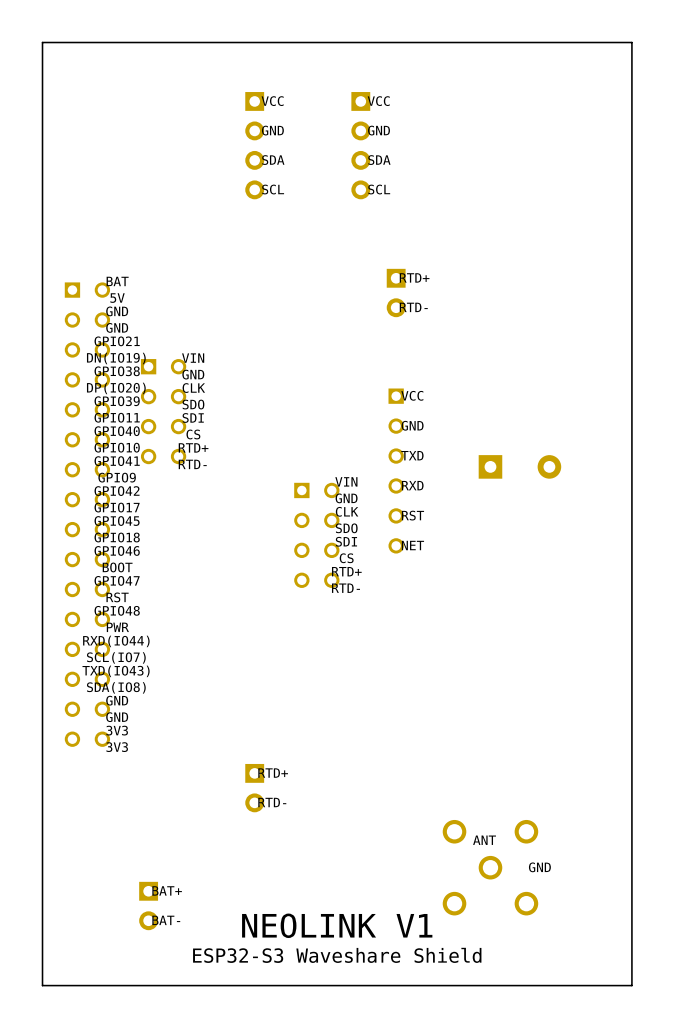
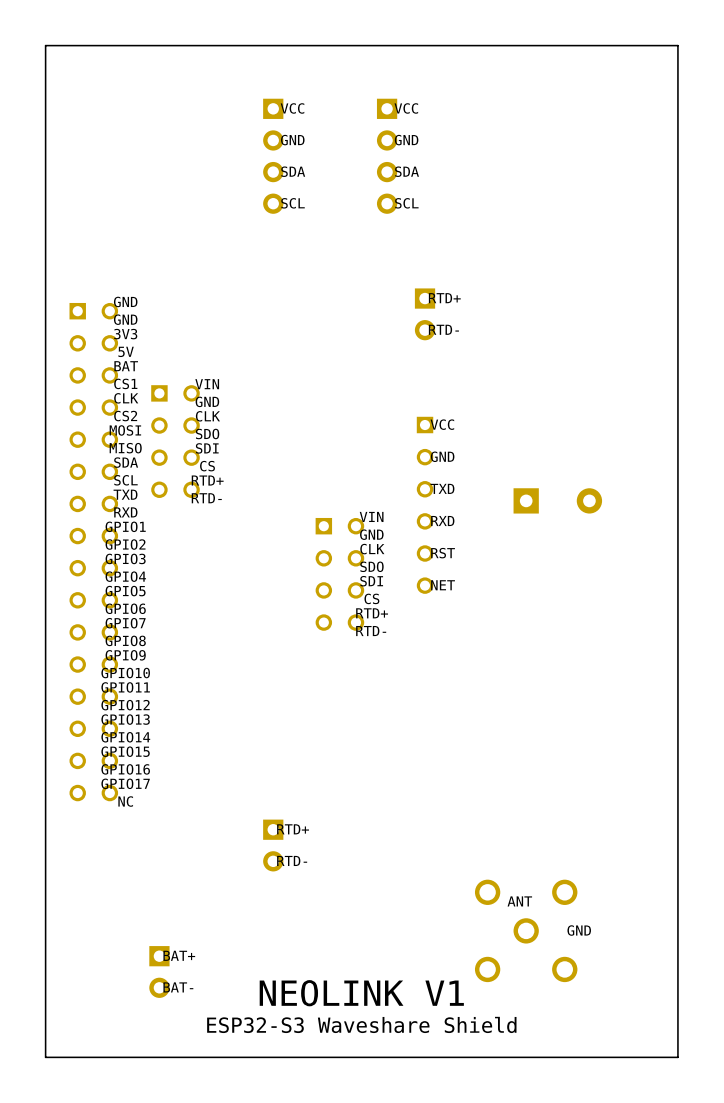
text: BAT (117, 281) -> GND (125, 301)
text: 5V (117, 298) -> GND (125, 319)
text: GND (117, 311) -> 3V3 (125, 334)
text: GND (117, 327) -> 5V (126, 351)
text: GPIO21 (117, 341) -> BAT (126, 366)
text: DN(IO19) (116, 358) -> CS1 (125, 383)
text: GPIO38 (117, 371) -> CLK (126, 398)
text: DP(IO20) (116, 388) -> CS2 (125, 416)
text: GPIO39 (117, 401) -> MOSI (125, 430)
text: GPIO11 (117, 417) -> MISO (125, 448)
text: GPIO40 (117, 431) -> SDA (126, 462)
text: GPIO10 (117, 447) -> SCL (125, 480)
text: GPIO41 (117, 461) -> TXD (125, 494)
text: GPIO9 (117, 477) -> RXD (125, 512)
text: GPIO42 (117, 491) -> GPIO1 (125, 526)
text: GPIO17 (117, 507) -> GPIO2 (125, 544)
text: GPIO45 (117, 521) -> GPIO3 (125, 558)
text: GPIO18 (117, 537) -> GPIO4 (125, 576)
text: GPIO46 (117, 550) -> GPIO5 (125, 591)
text: BOOT (117, 567) -> GPIO6 (125, 608)
text: GPIO47 (117, 580) -> GPIO7 (125, 623)
text: RST (117, 597) -> GPIO8 (125, 640)
text: GPIO48 (117, 610) -> GPIO9 (125, 655)
text: PWR (117, 627) -> GPIO10 (125, 673)
text: RXD(IO44) (116, 641) -> GPIO11 (125, 687)
text: SCL(IO7) (116, 657) -> GPIO12 (125, 705)
text: TXD(IO43) (116, 671) -> GPIO13 (125, 719)
text: SDA(IO8) (116, 687) -> GPIO14 (125, 737)
text: GND (117, 700) -> GPIO15 (125, 751)
text: GND (117, 717) -> GPIO16 (125, 769)
text: 3V3 (117, 730) -> GPIO17 (125, 783)
text: 3V3 (117, 747) -> NC (125, 801)

